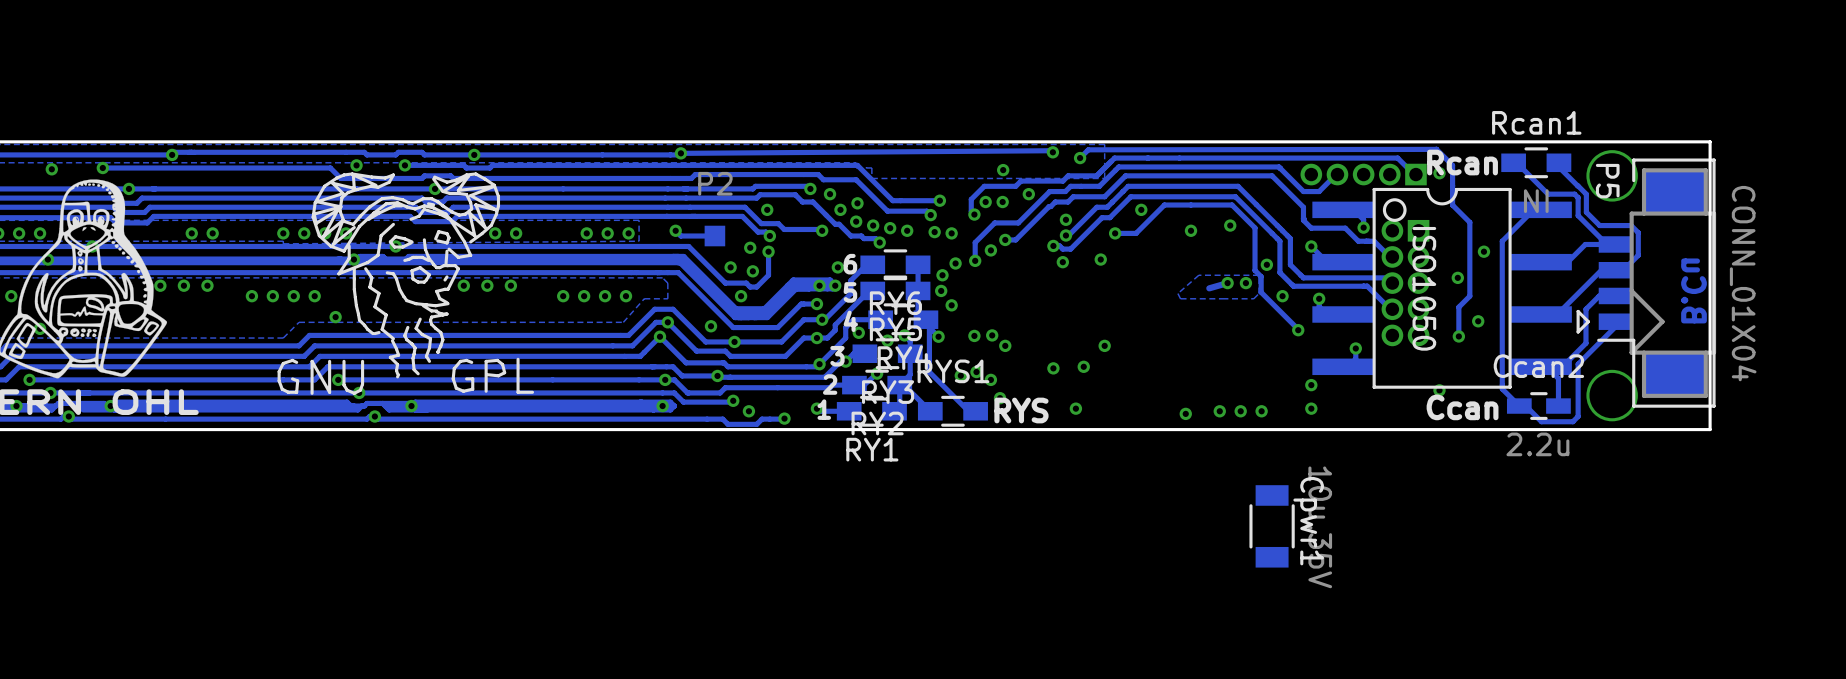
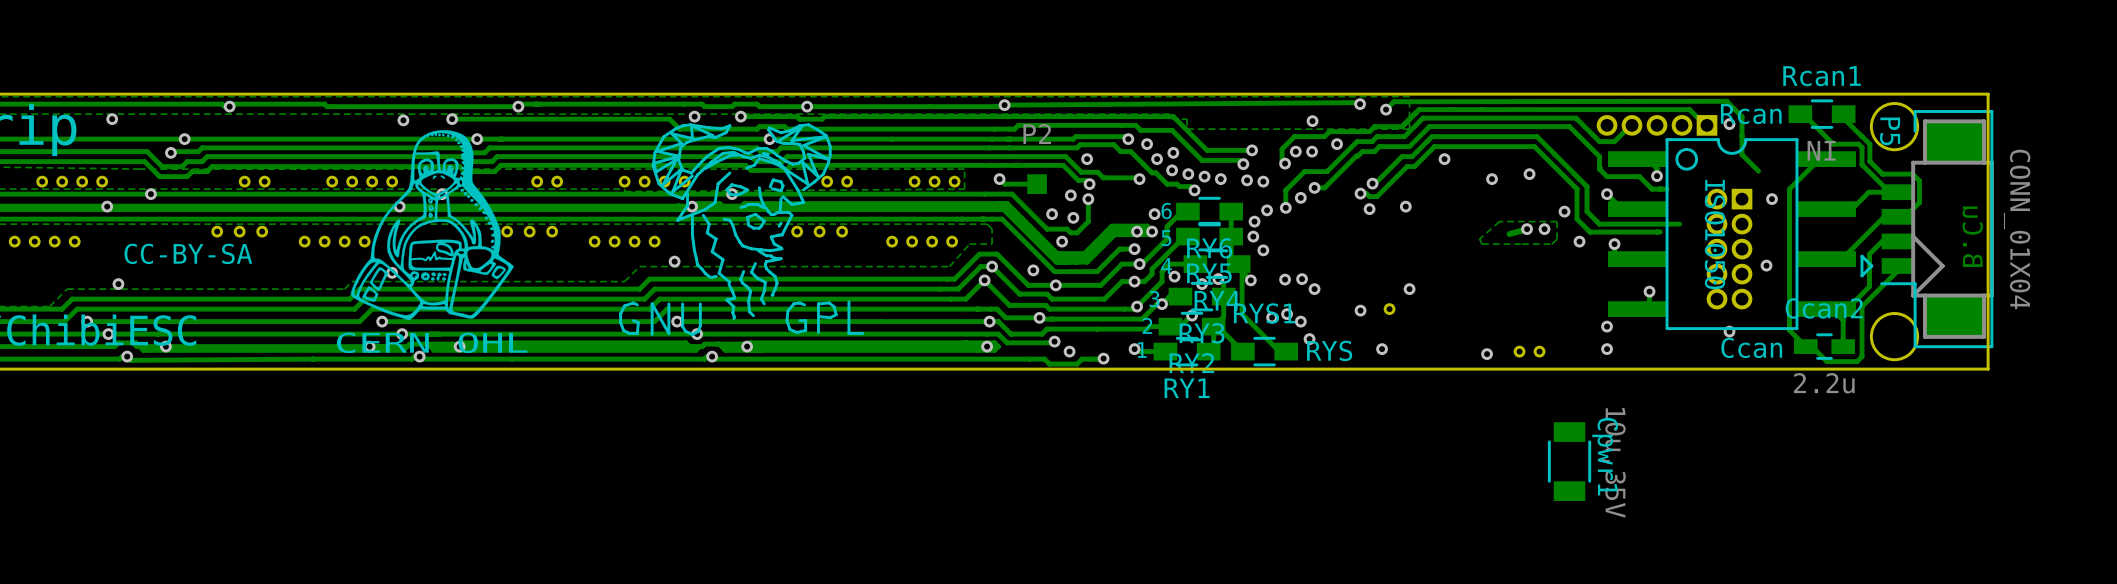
via: (1065, 219) -> none
track: (1469, 222) (1469, 296) (1458, 307) (1458, 336) -> none
track: (1115, 233) (1136, 233) (1164, 205) (1232, 205) (1255, 227) (1255, 270) (1261, 276) (1261, 292) (1298, 330) -> none
via: (1115, 233) -> none
track: (1374, 241) (1389, 256) (1392, 256) -> none
via: (1457, 277) -> none
part position: (1405, 283) -> (1729, 249)
track: (1367, 286) (1392, 309) -> none
via: (1298, 330) -> none
via: (1458, 336) -> none
part: (1261, 411) -> none

